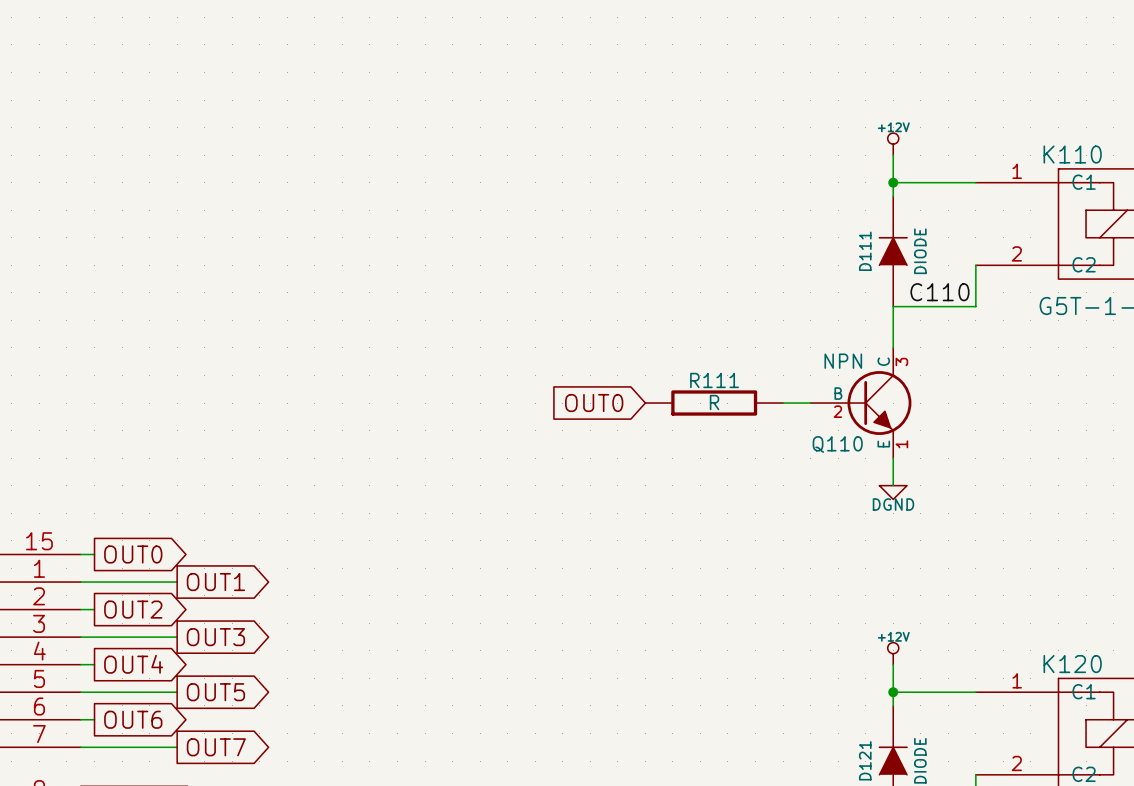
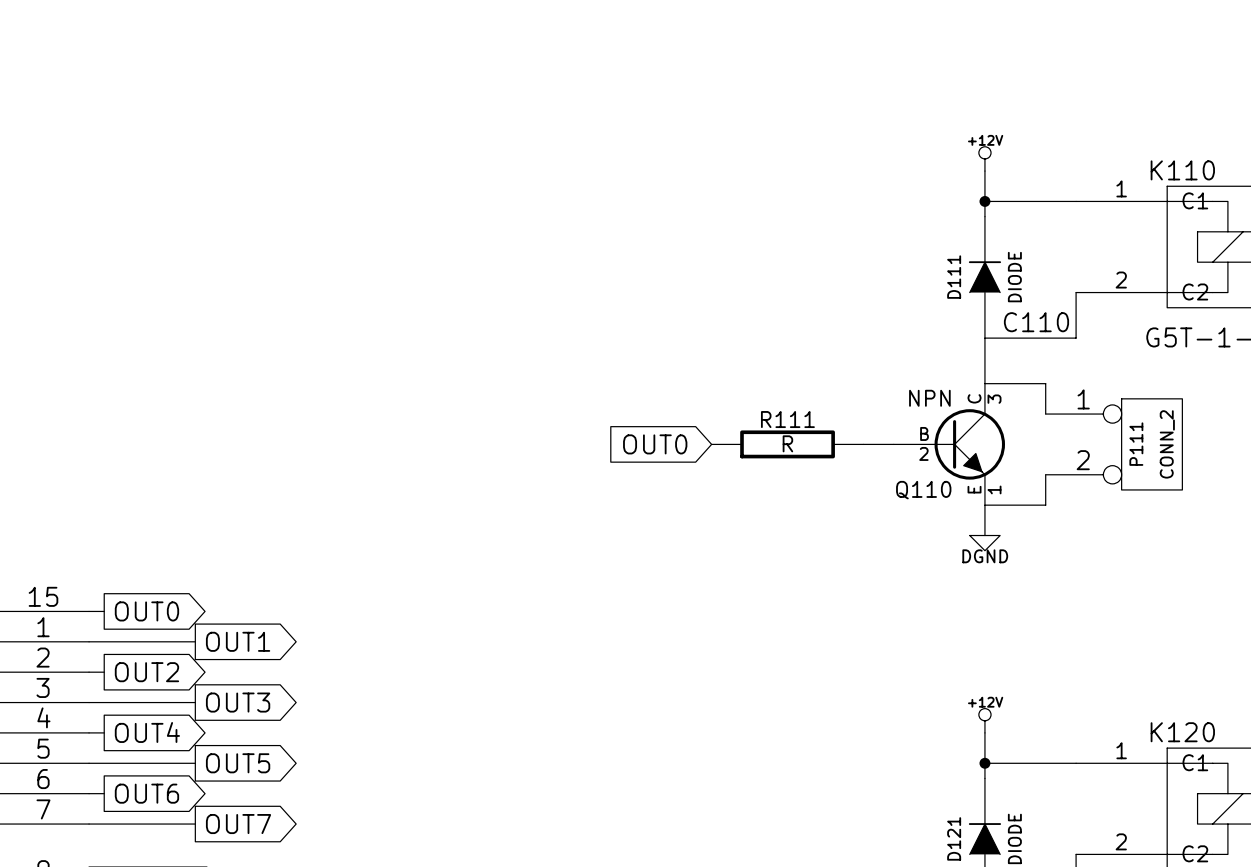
wire: none -> (984, 383) (1045, 383) (1045, 414)
P111: none -> CONN_2 (1114, 444)
wire: none -> (1045, 474) (1045, 505) (984, 505)

